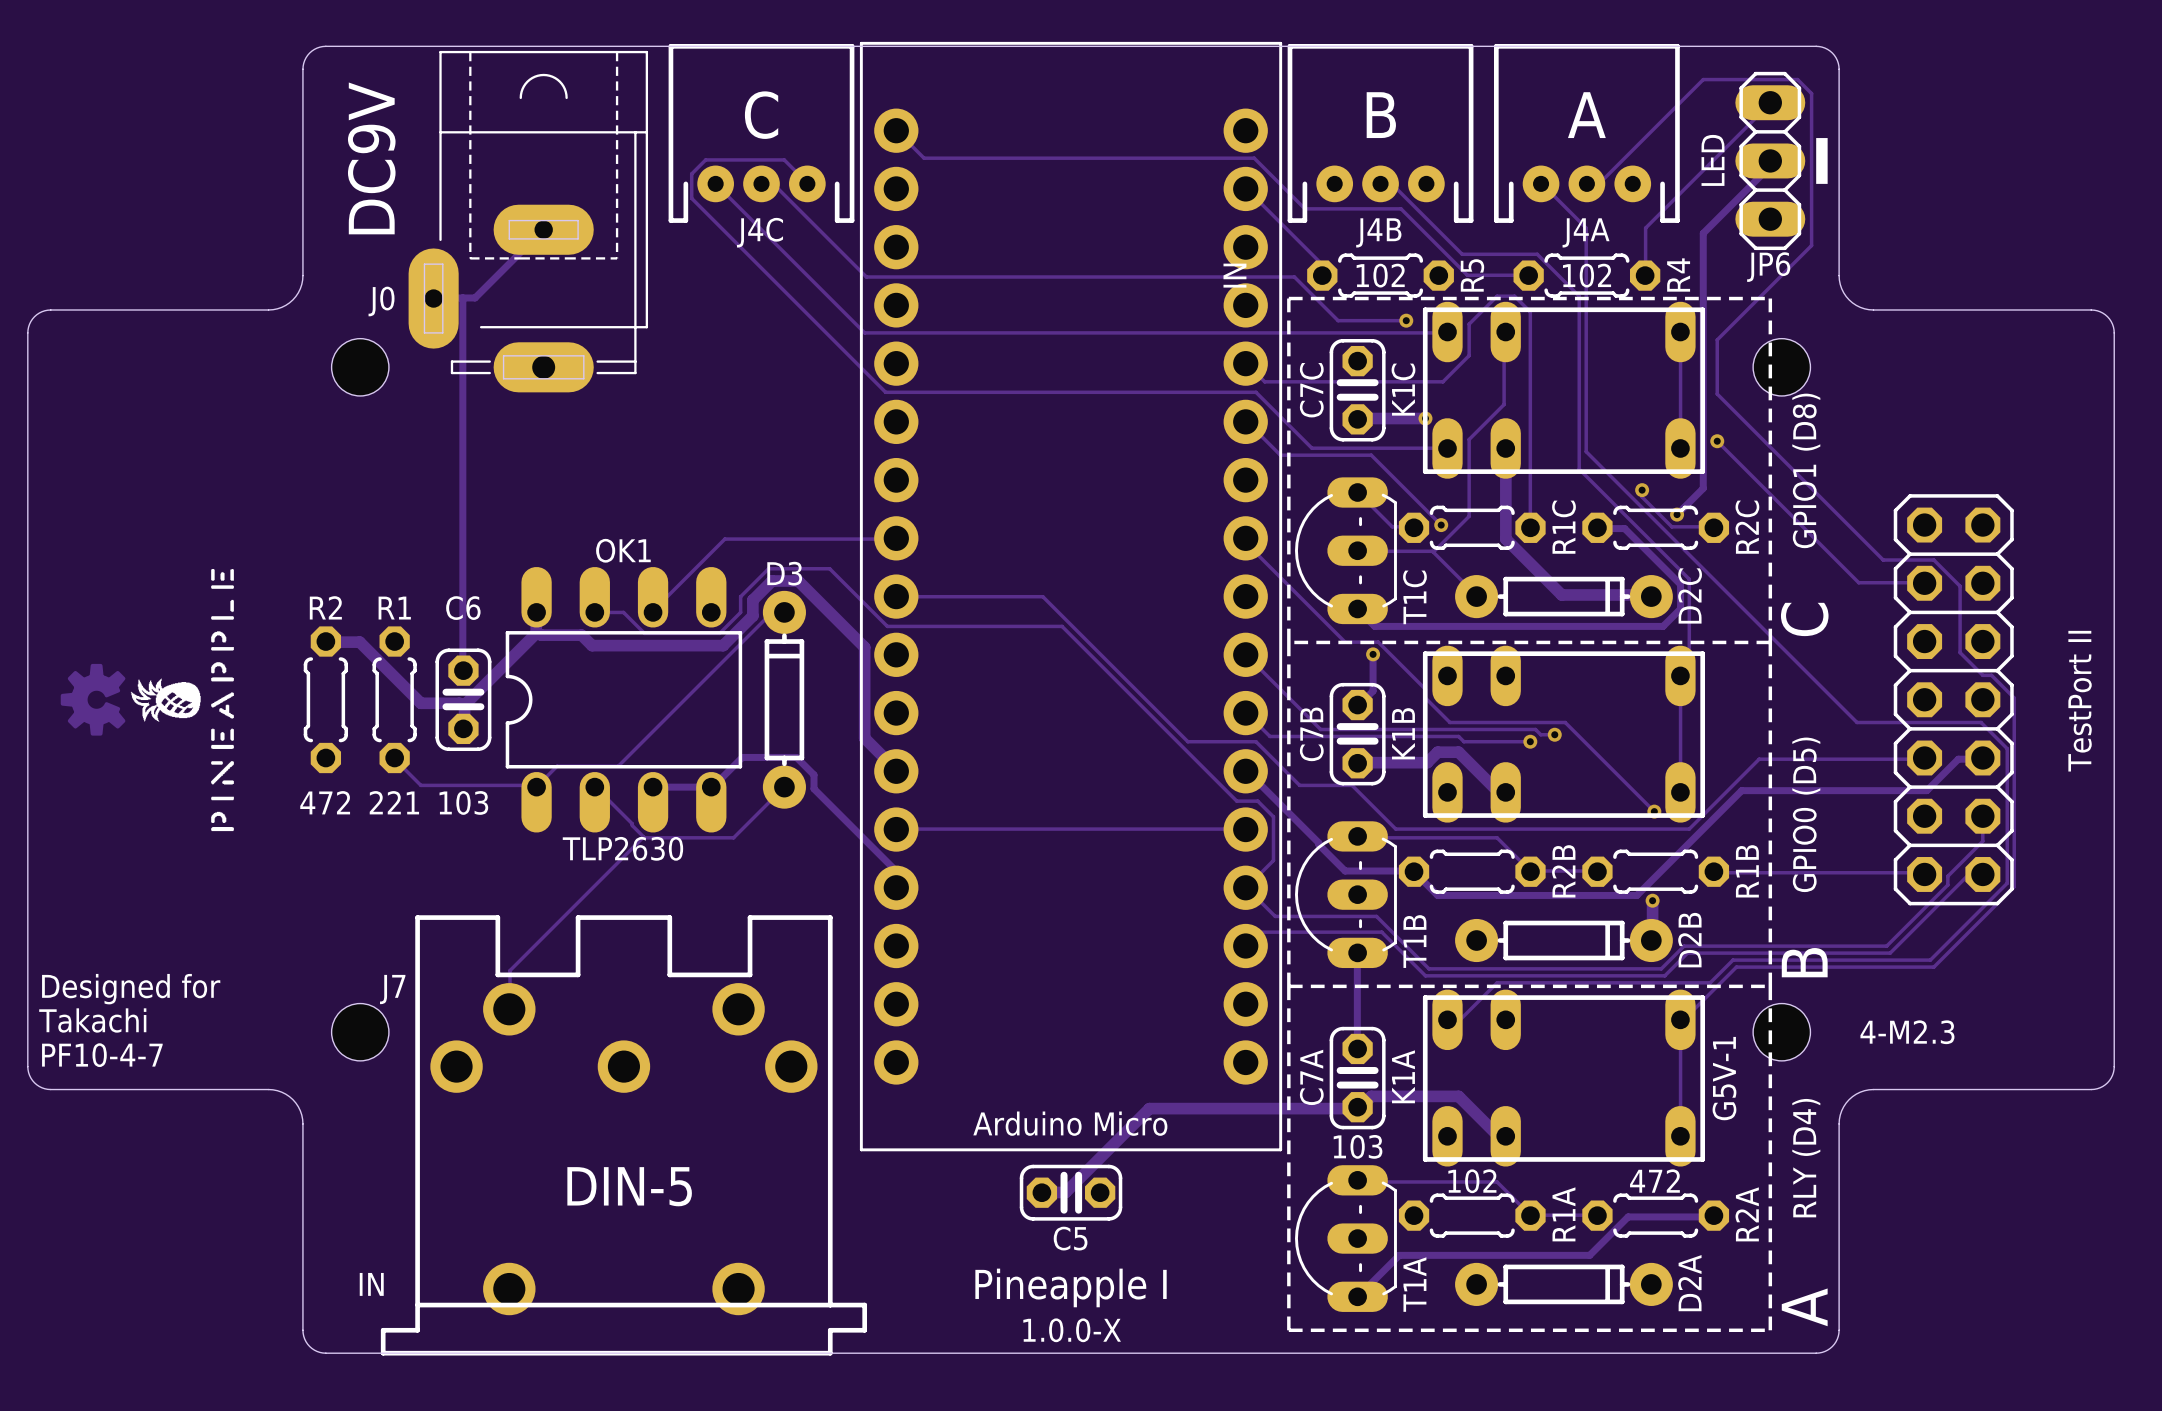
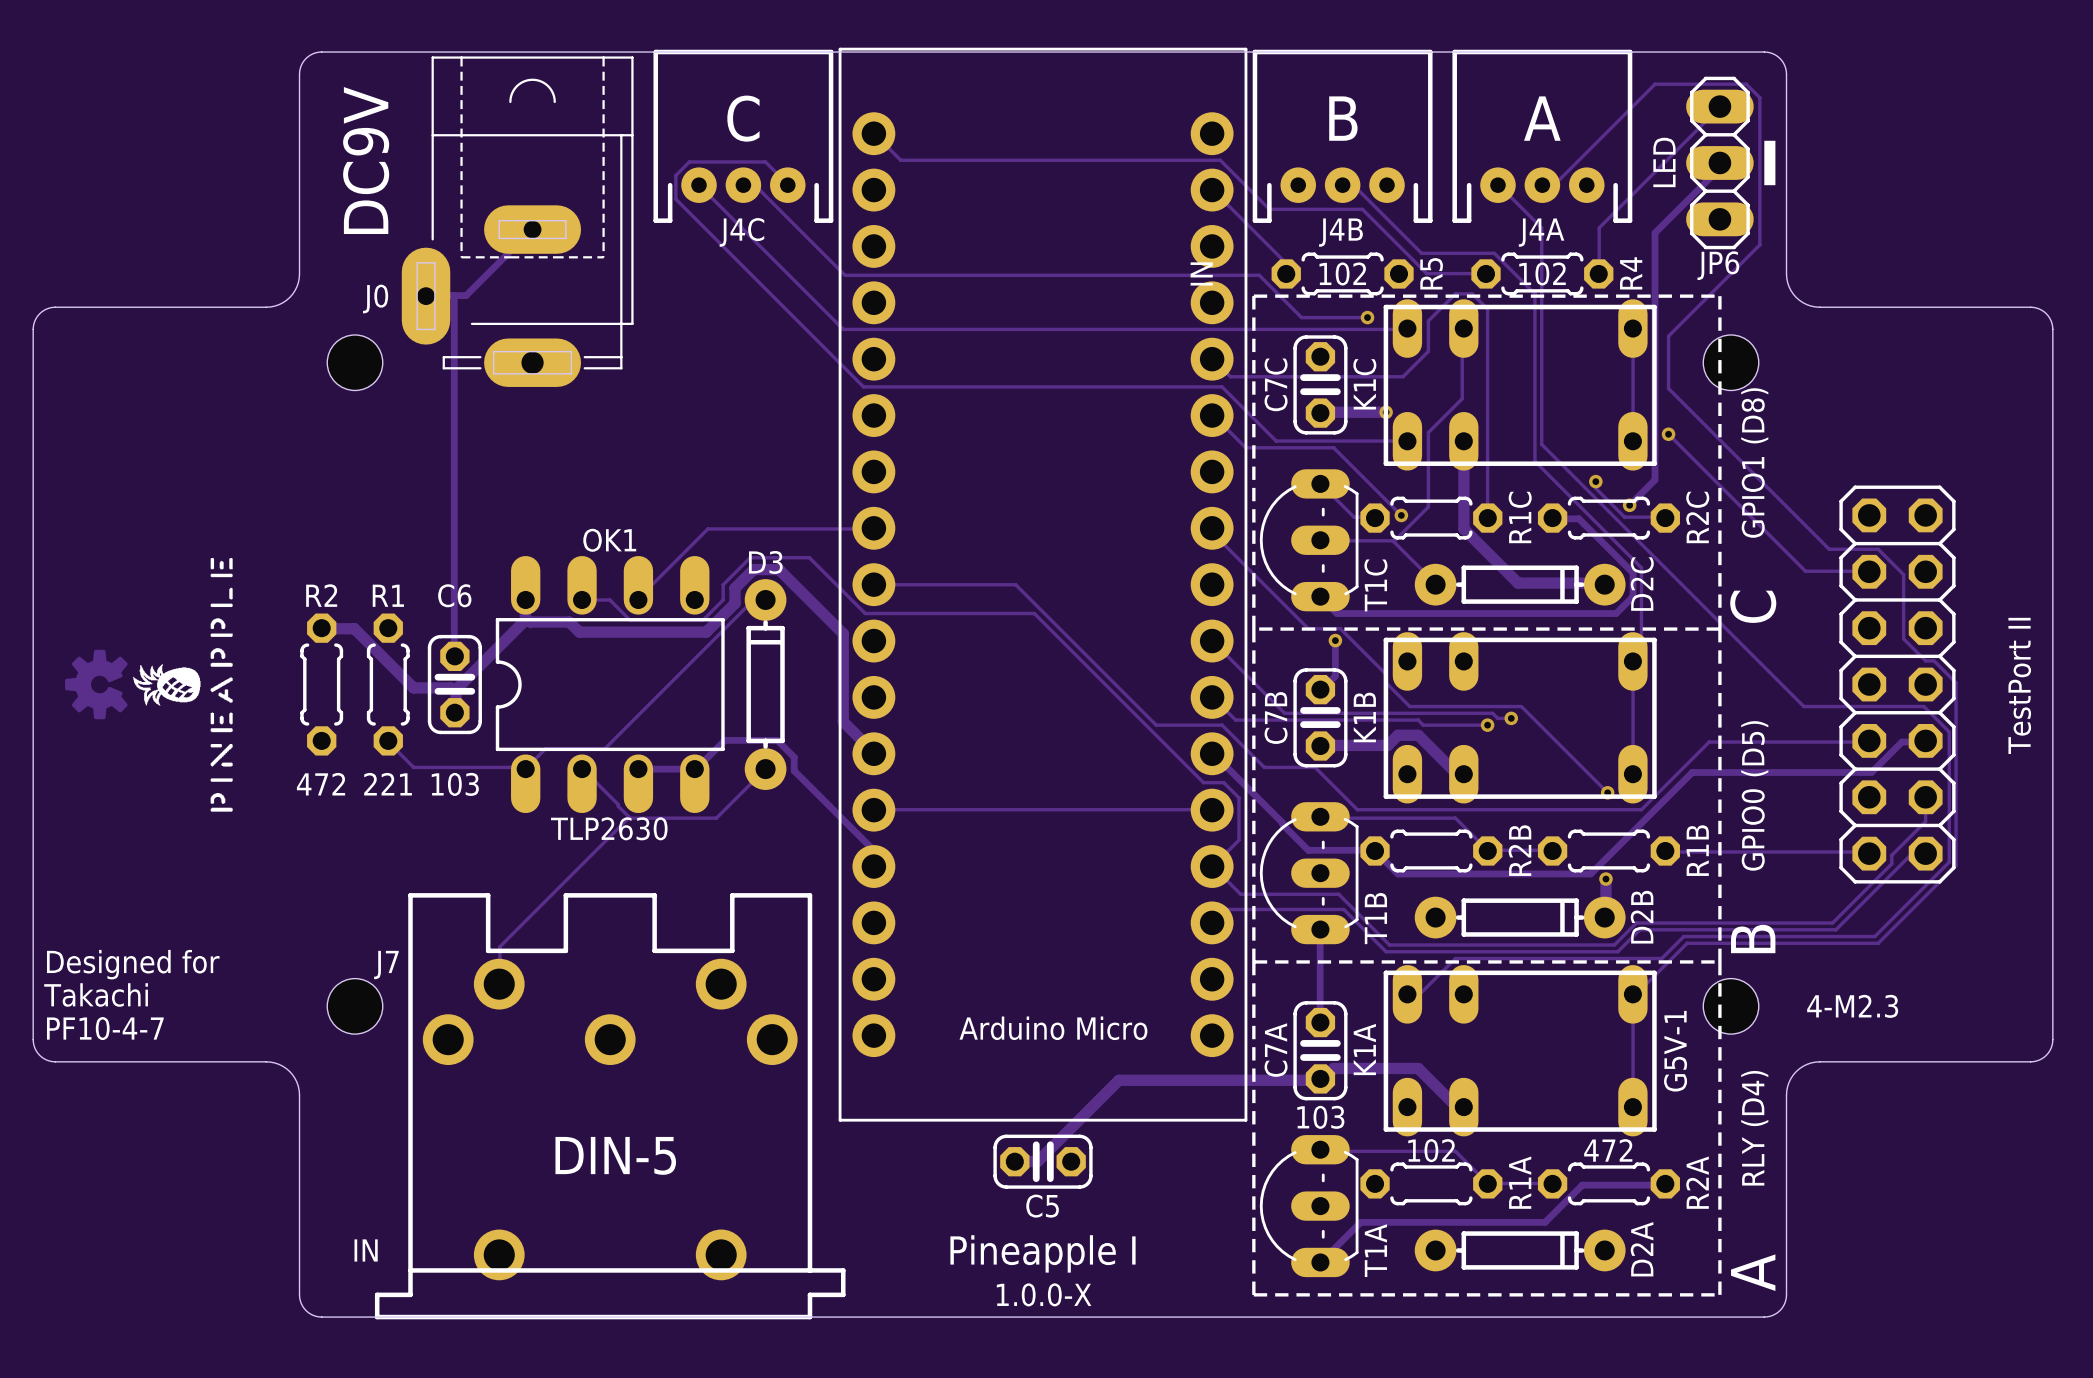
text position: Arduino Micro (1070, 1123) -> Arduino Micro (1053, 1028)

